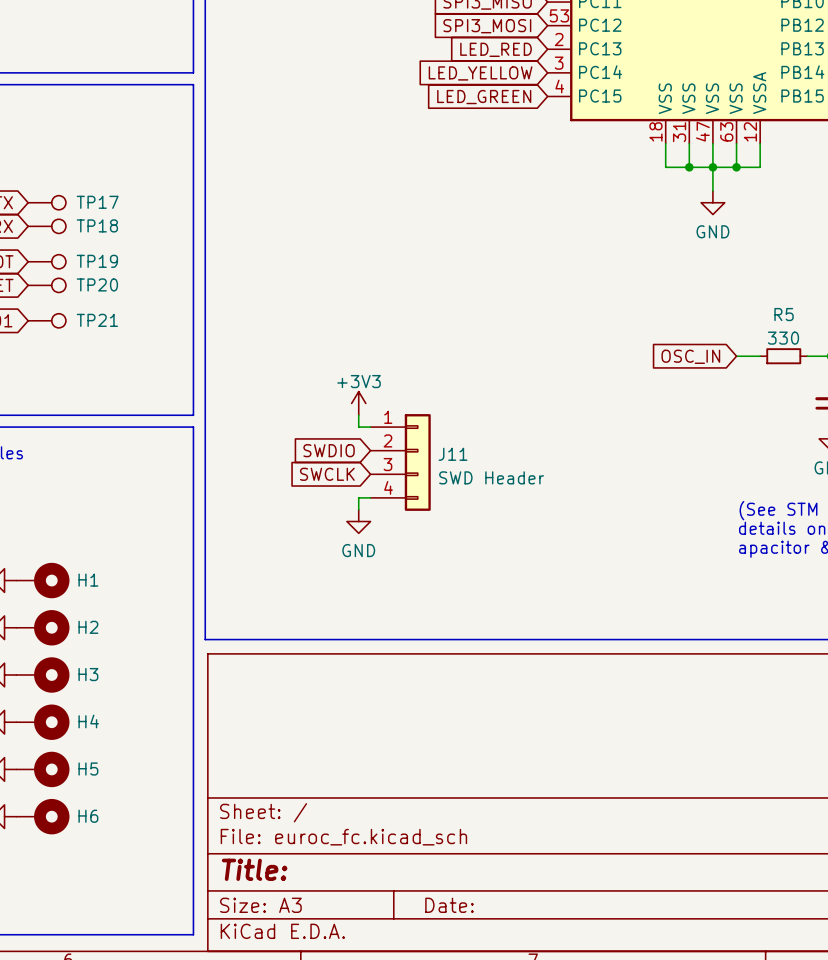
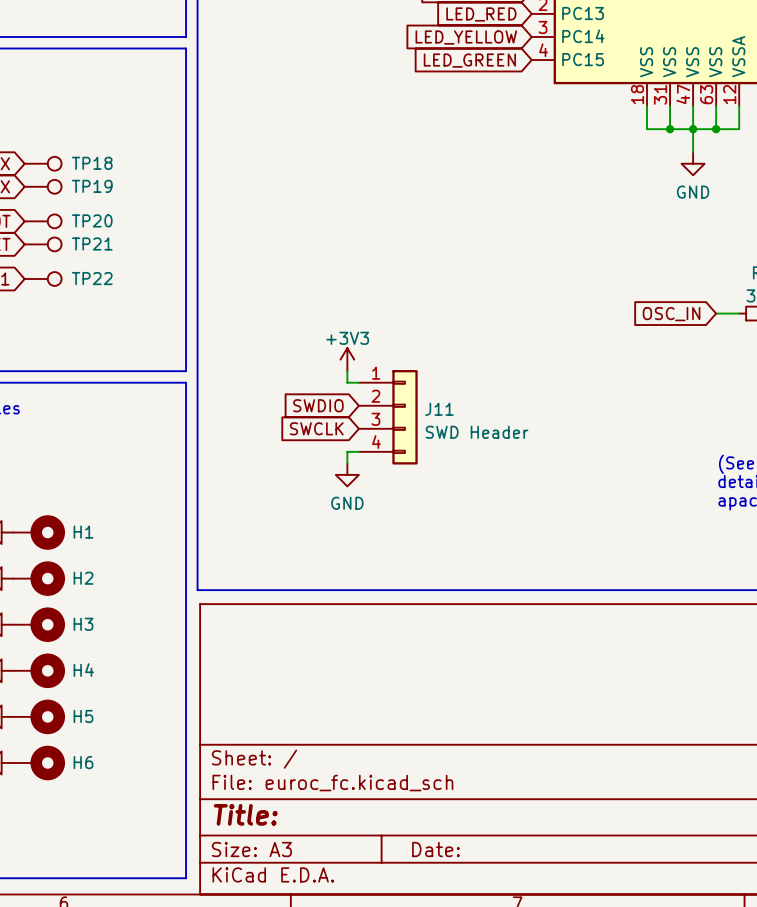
TP17 name: TP17 (97, 202) -> TP18 (92, 163)
TP18 name: TP18 (97, 225) -> TP19 (92, 186)
TP19 name: TP19 (97, 261) -> TP20 (92, 220)
TP20 name: TP20 (97, 284) -> TP21 (92, 243)
TP21 name: TP21 (97, 320) -> TP22 (92, 278)

